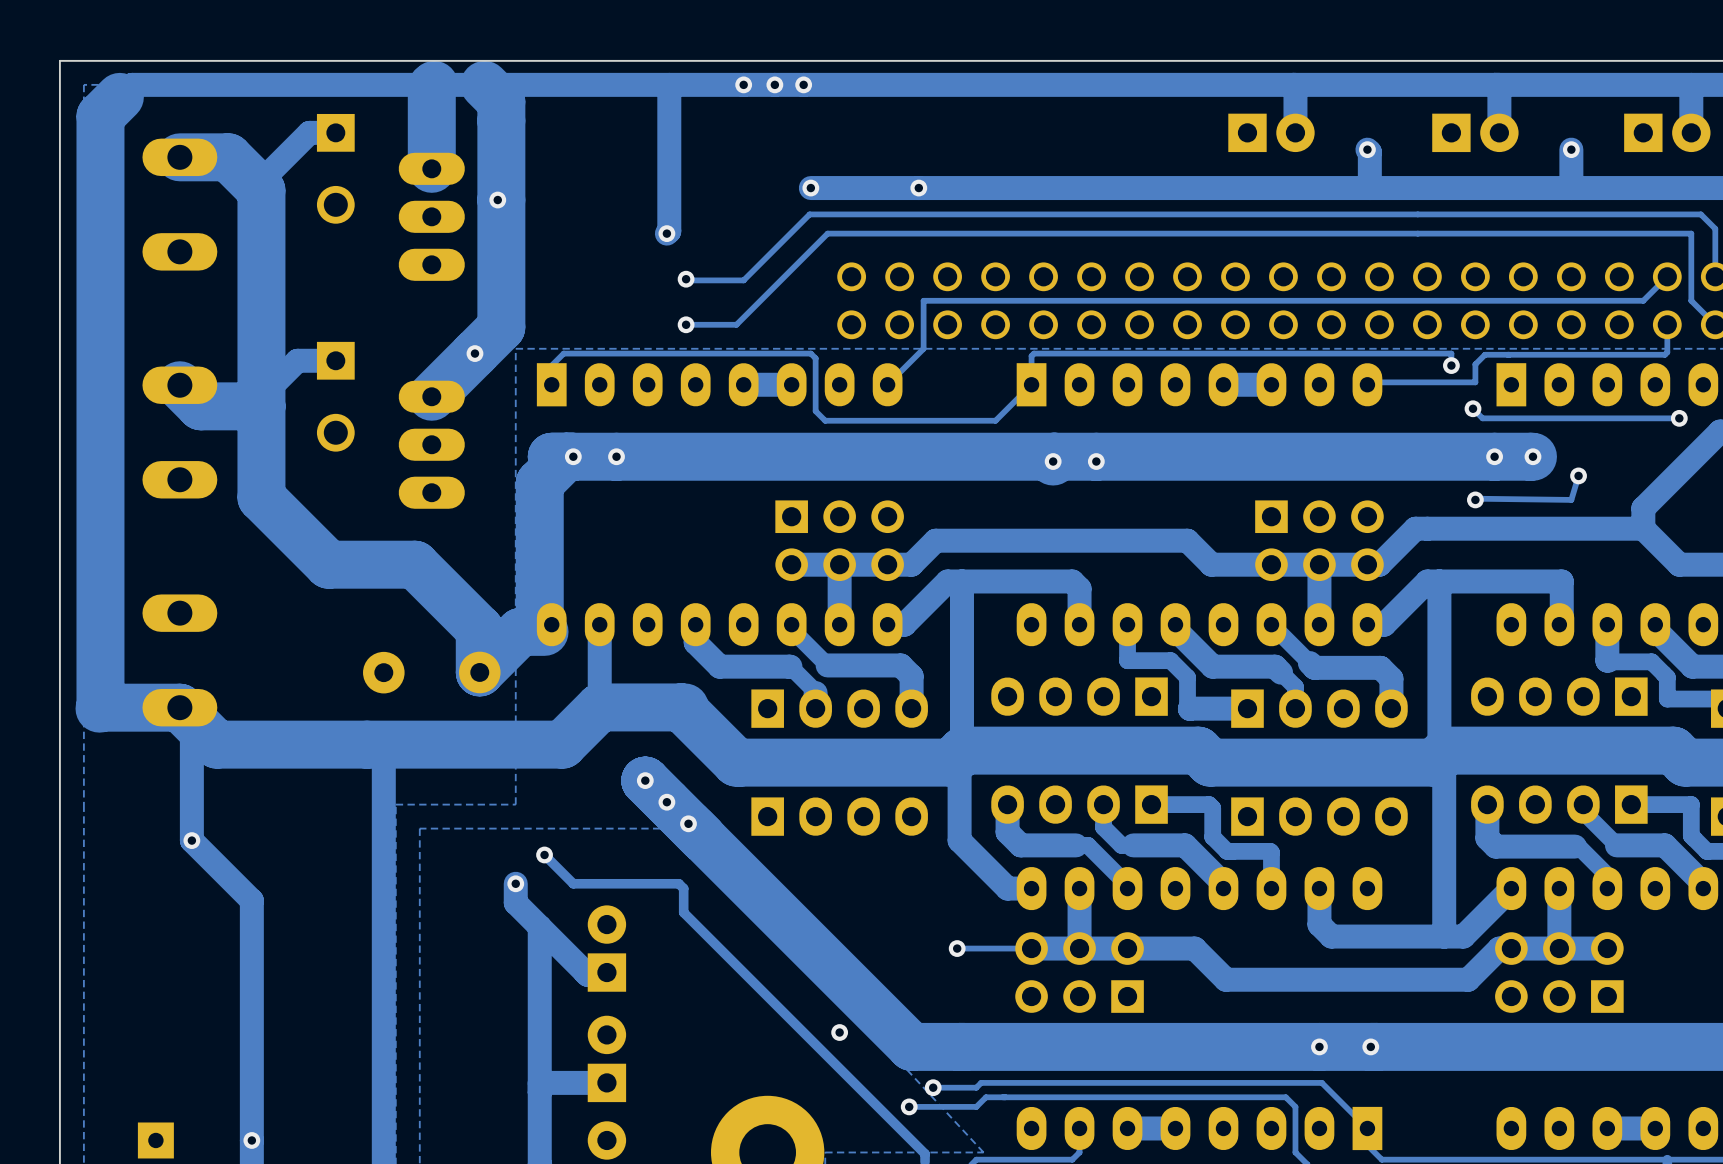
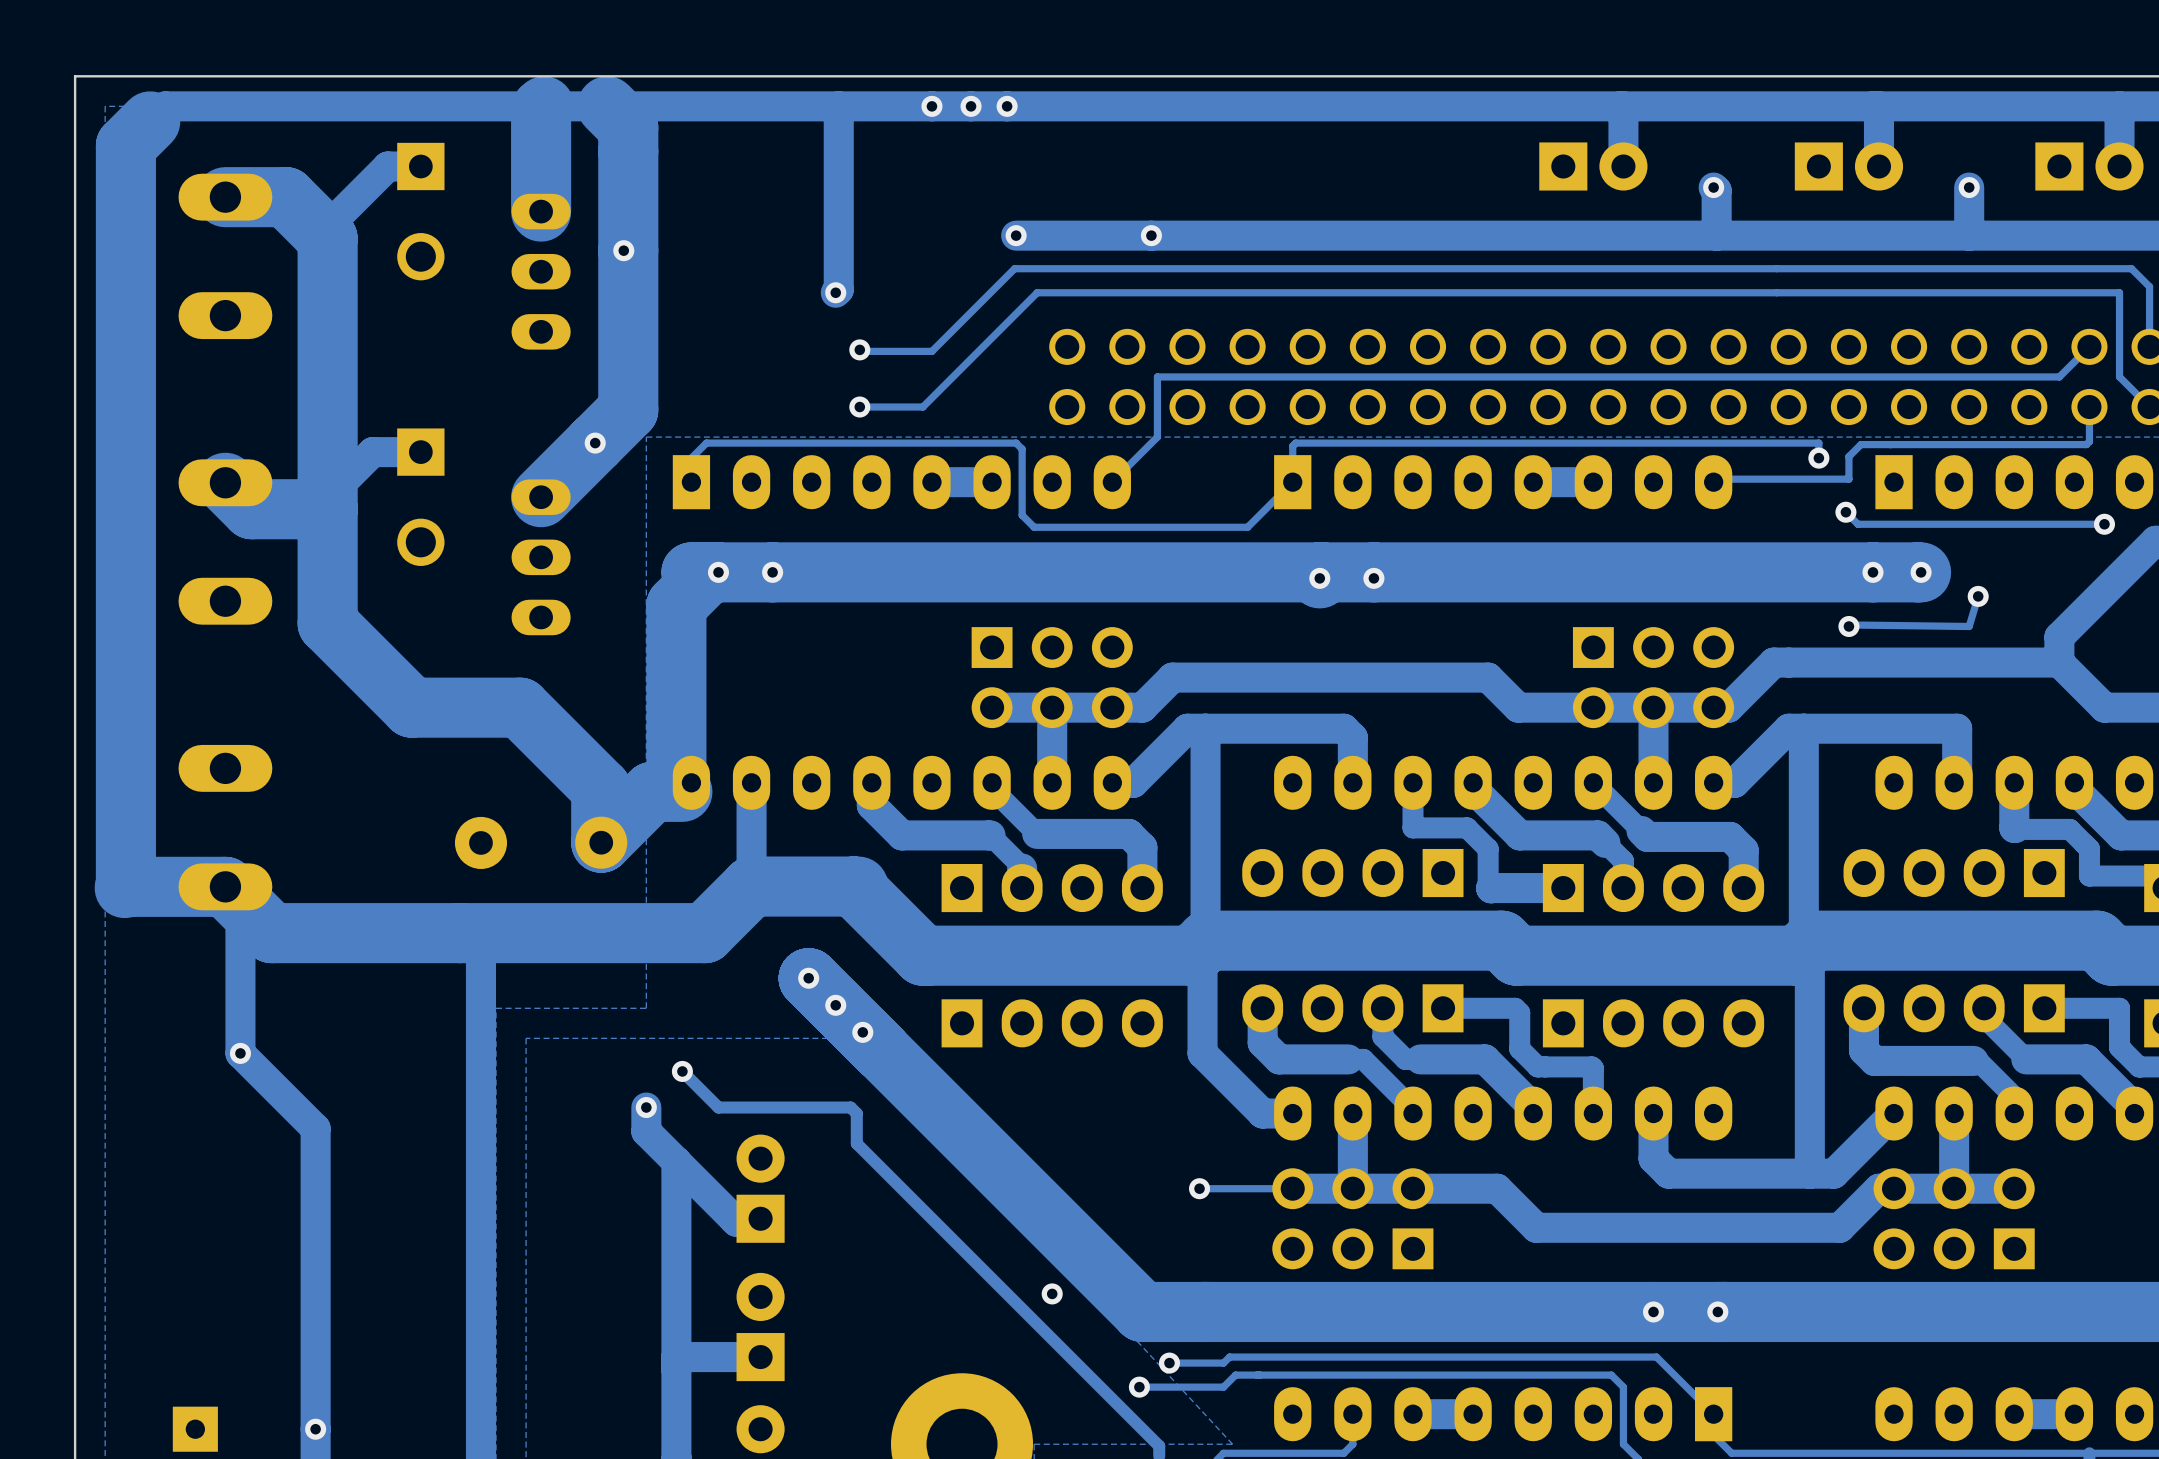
part footprint: [398, 152, 465, 281] -> [511, 193, 571, 350]
part footprint: [398, 380, 465, 509] -> [511, 479, 571, 636]

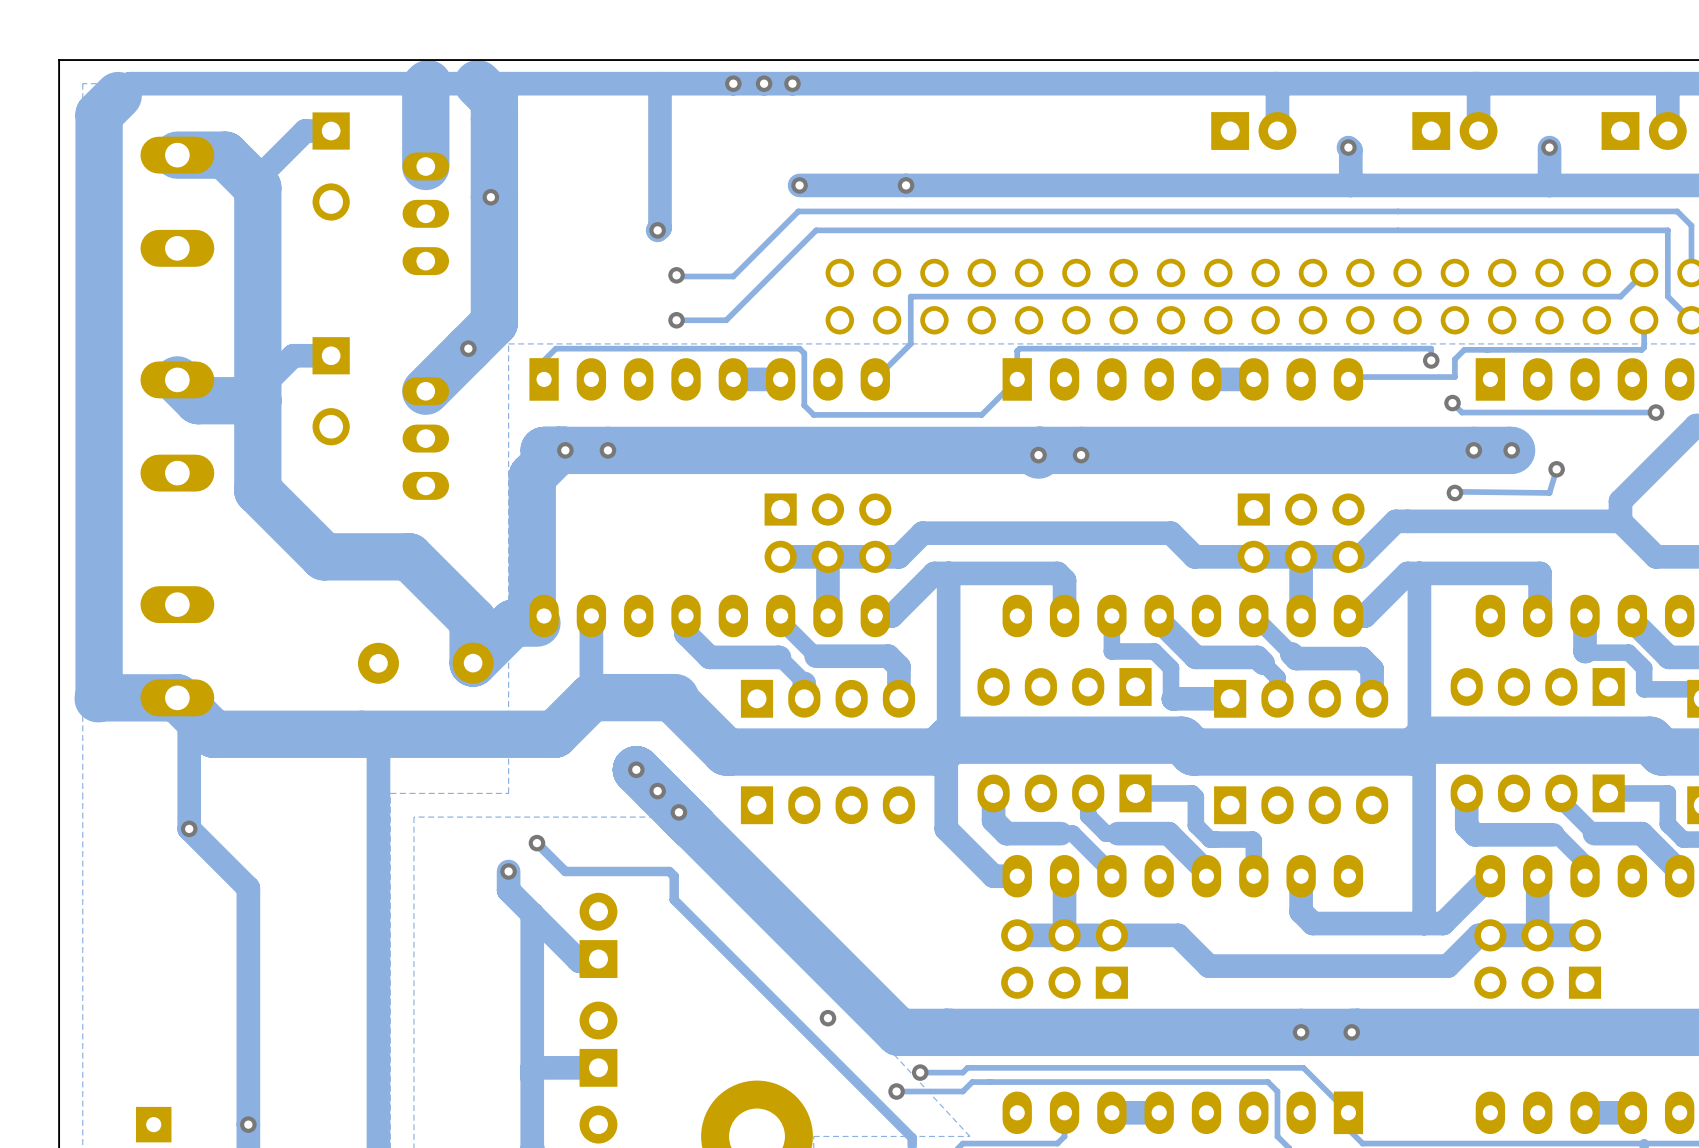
via: (1199, 1188) -> none
track: (1292, 1188) (1199, 1188) -> none

